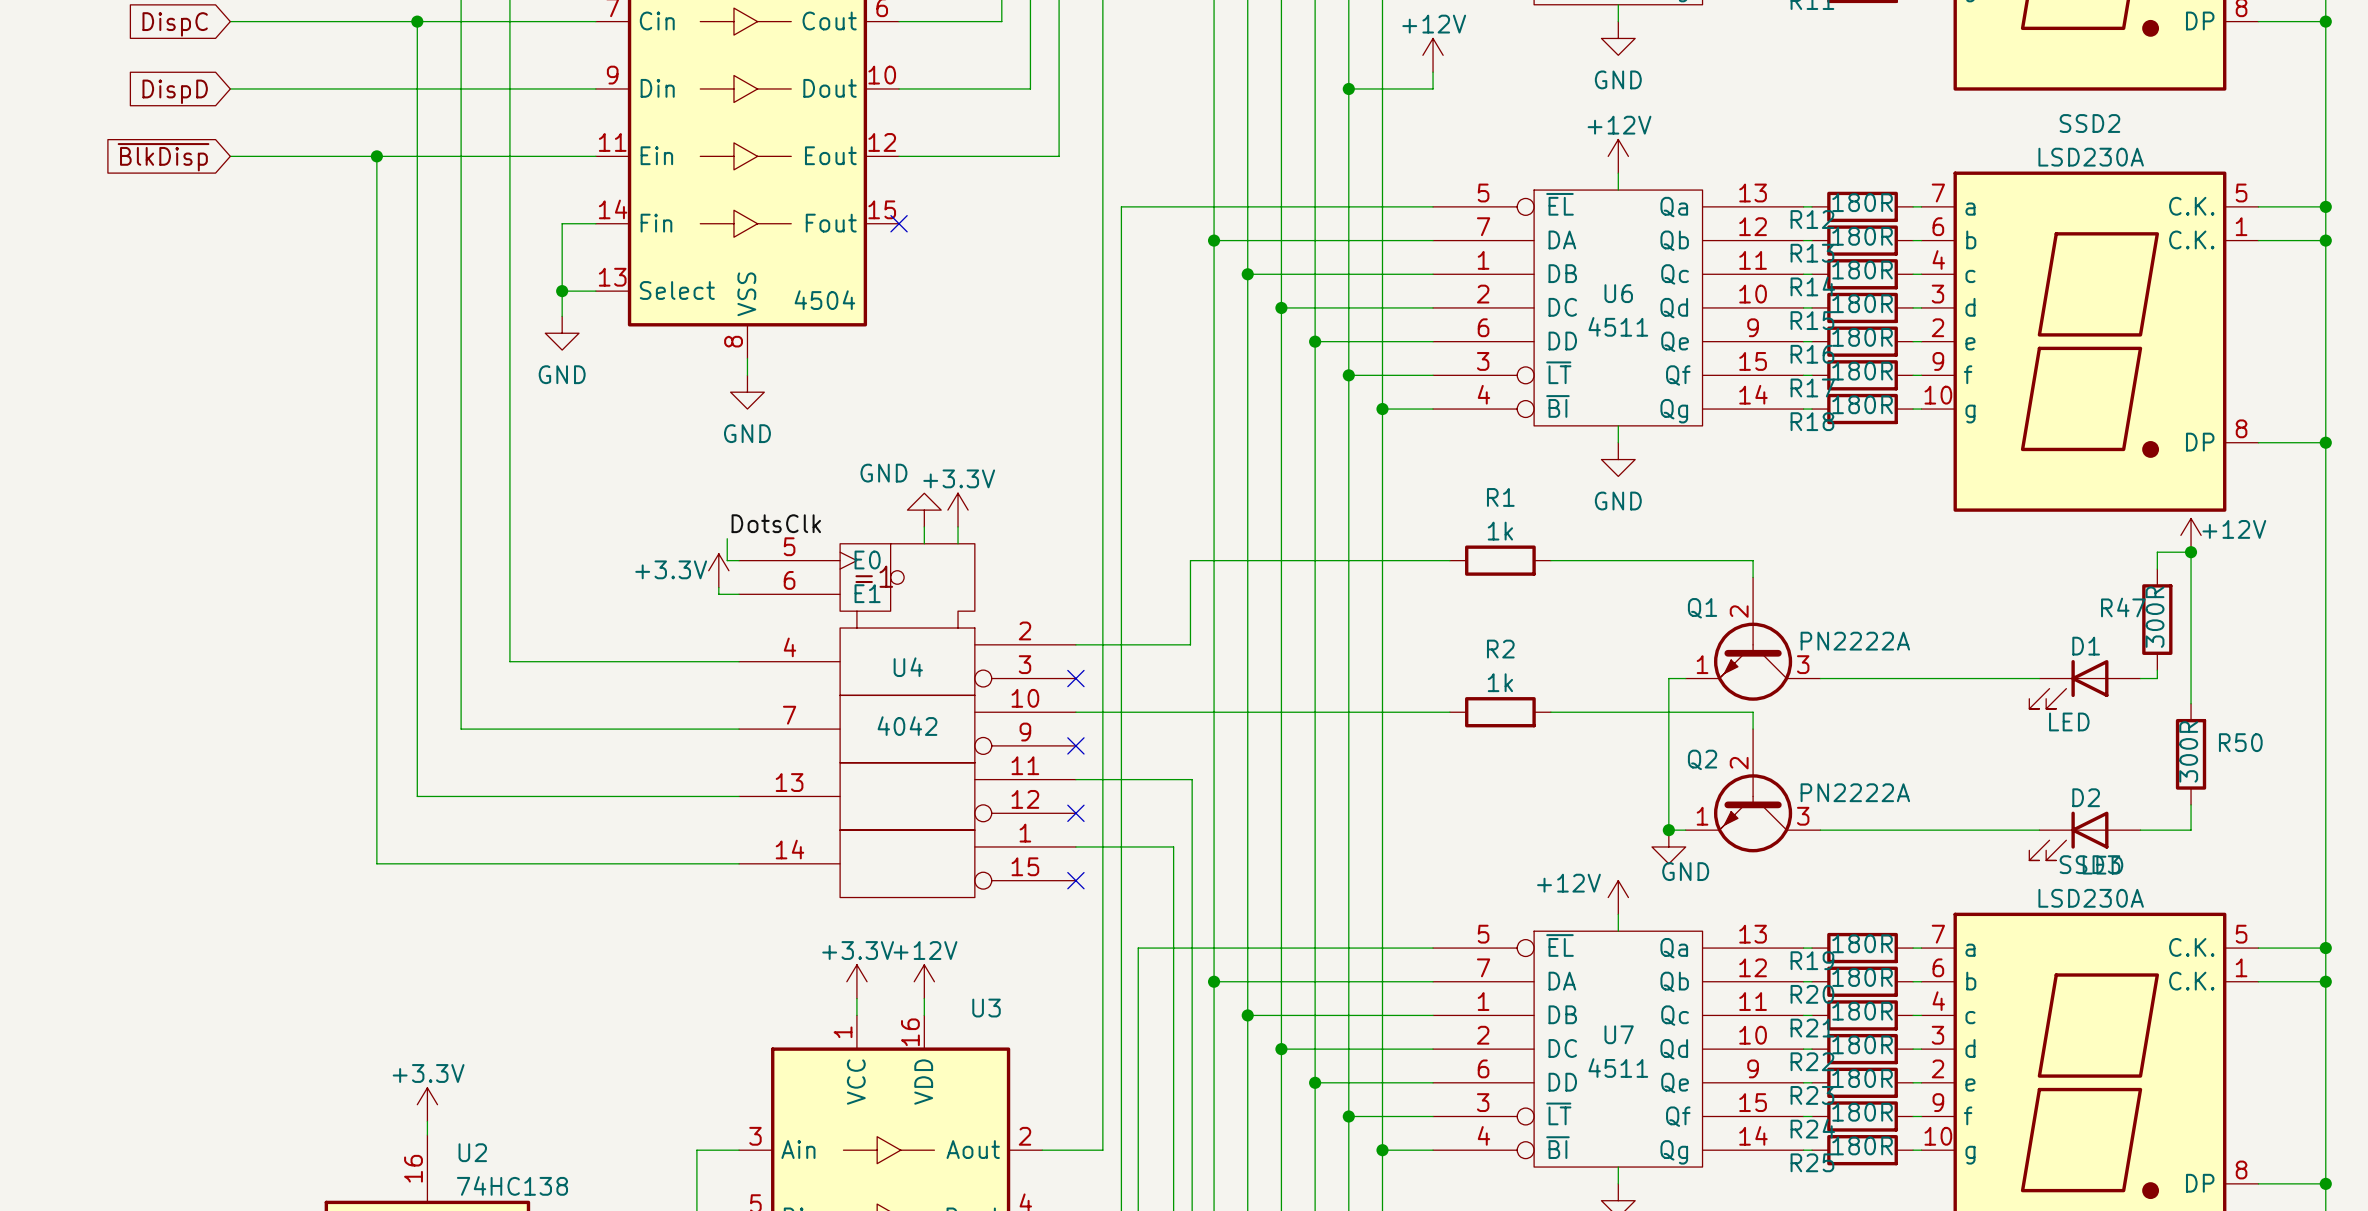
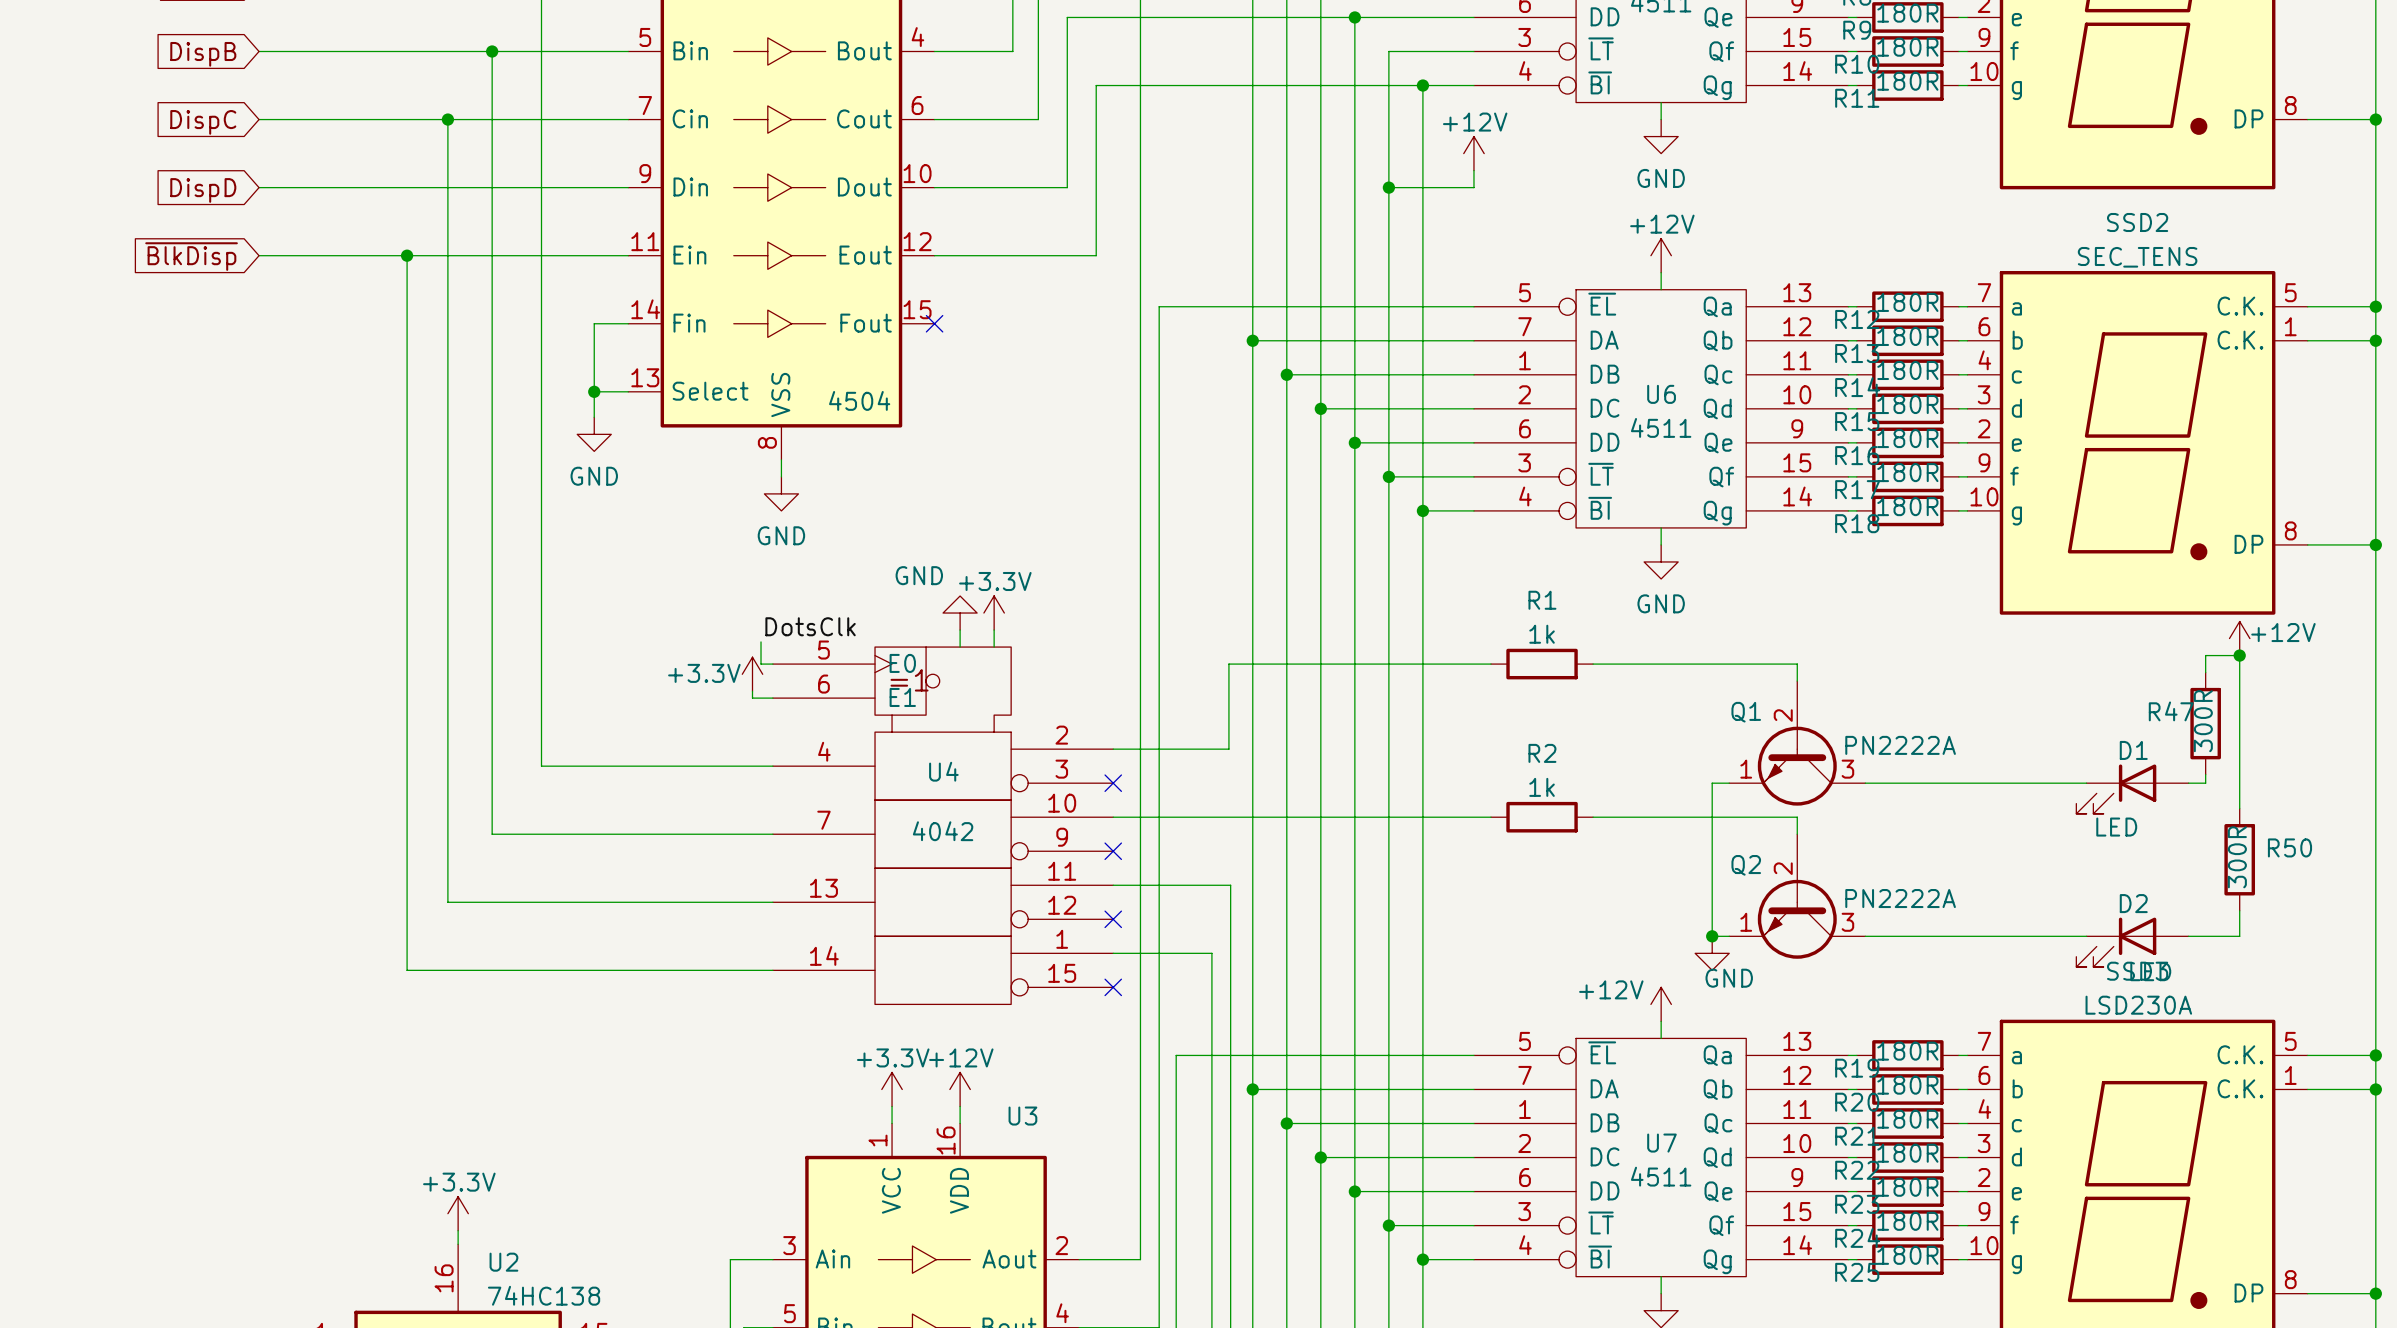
SSD2 value: LSD230A (2091, 157) -> SEC_TENS (2137, 257)

